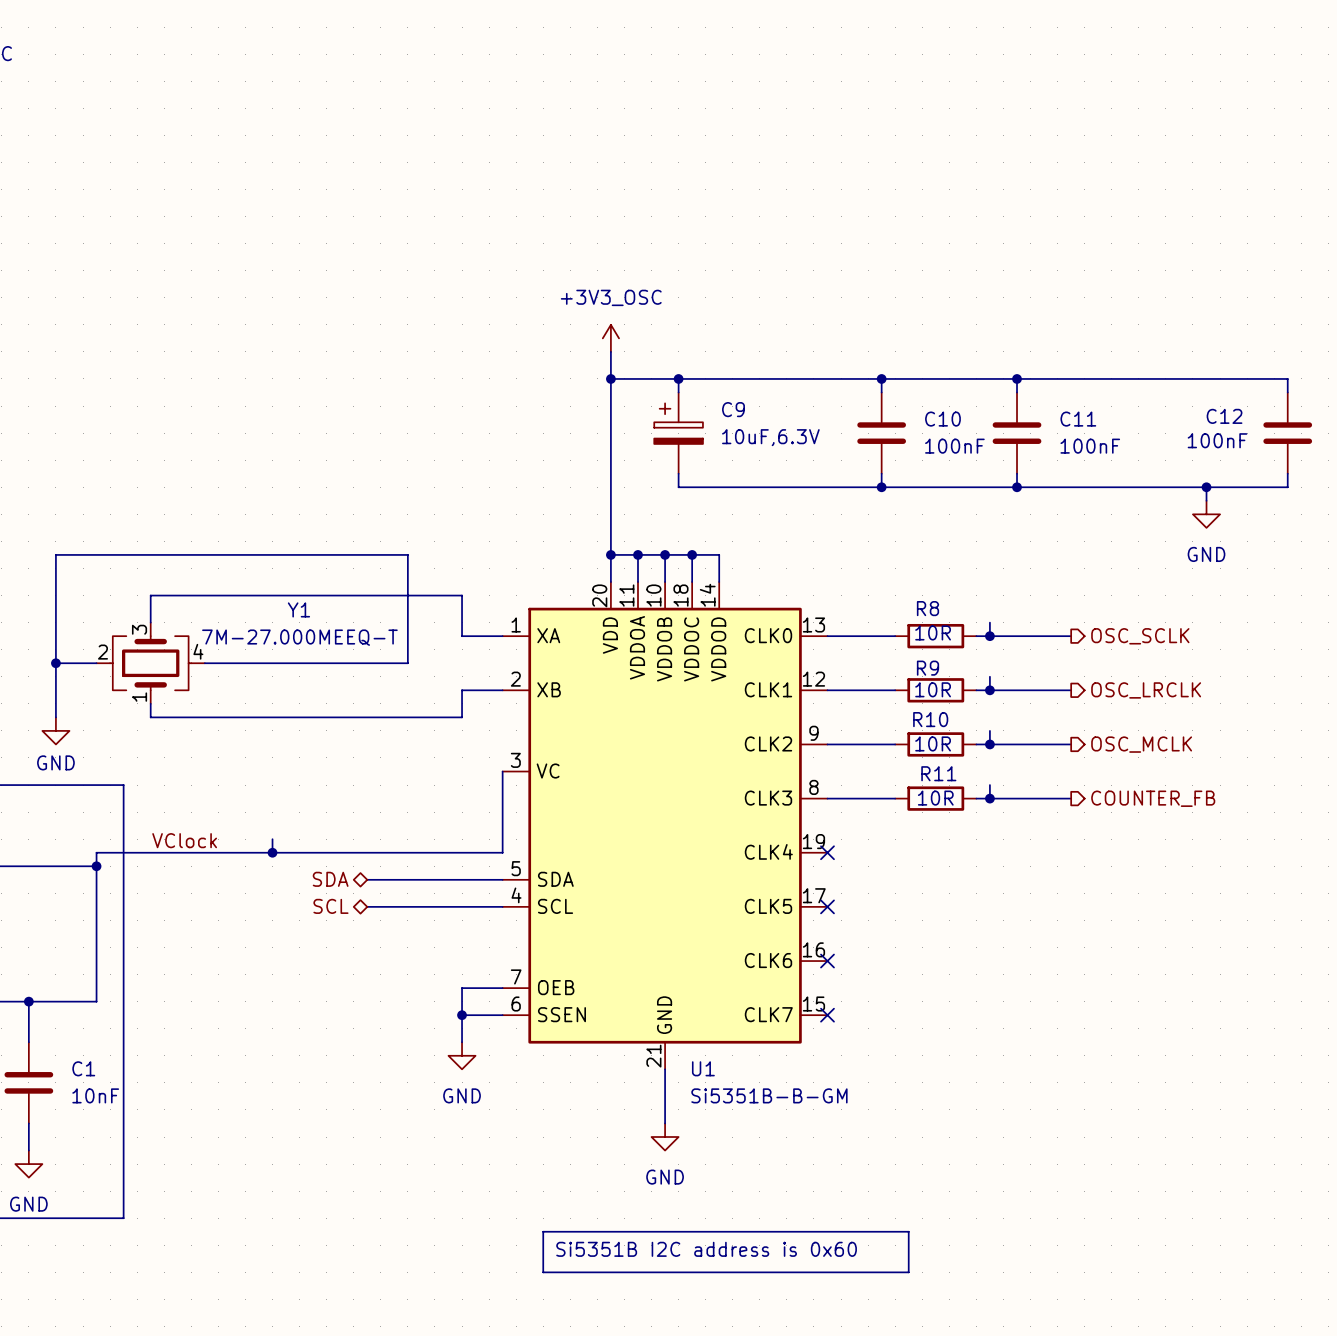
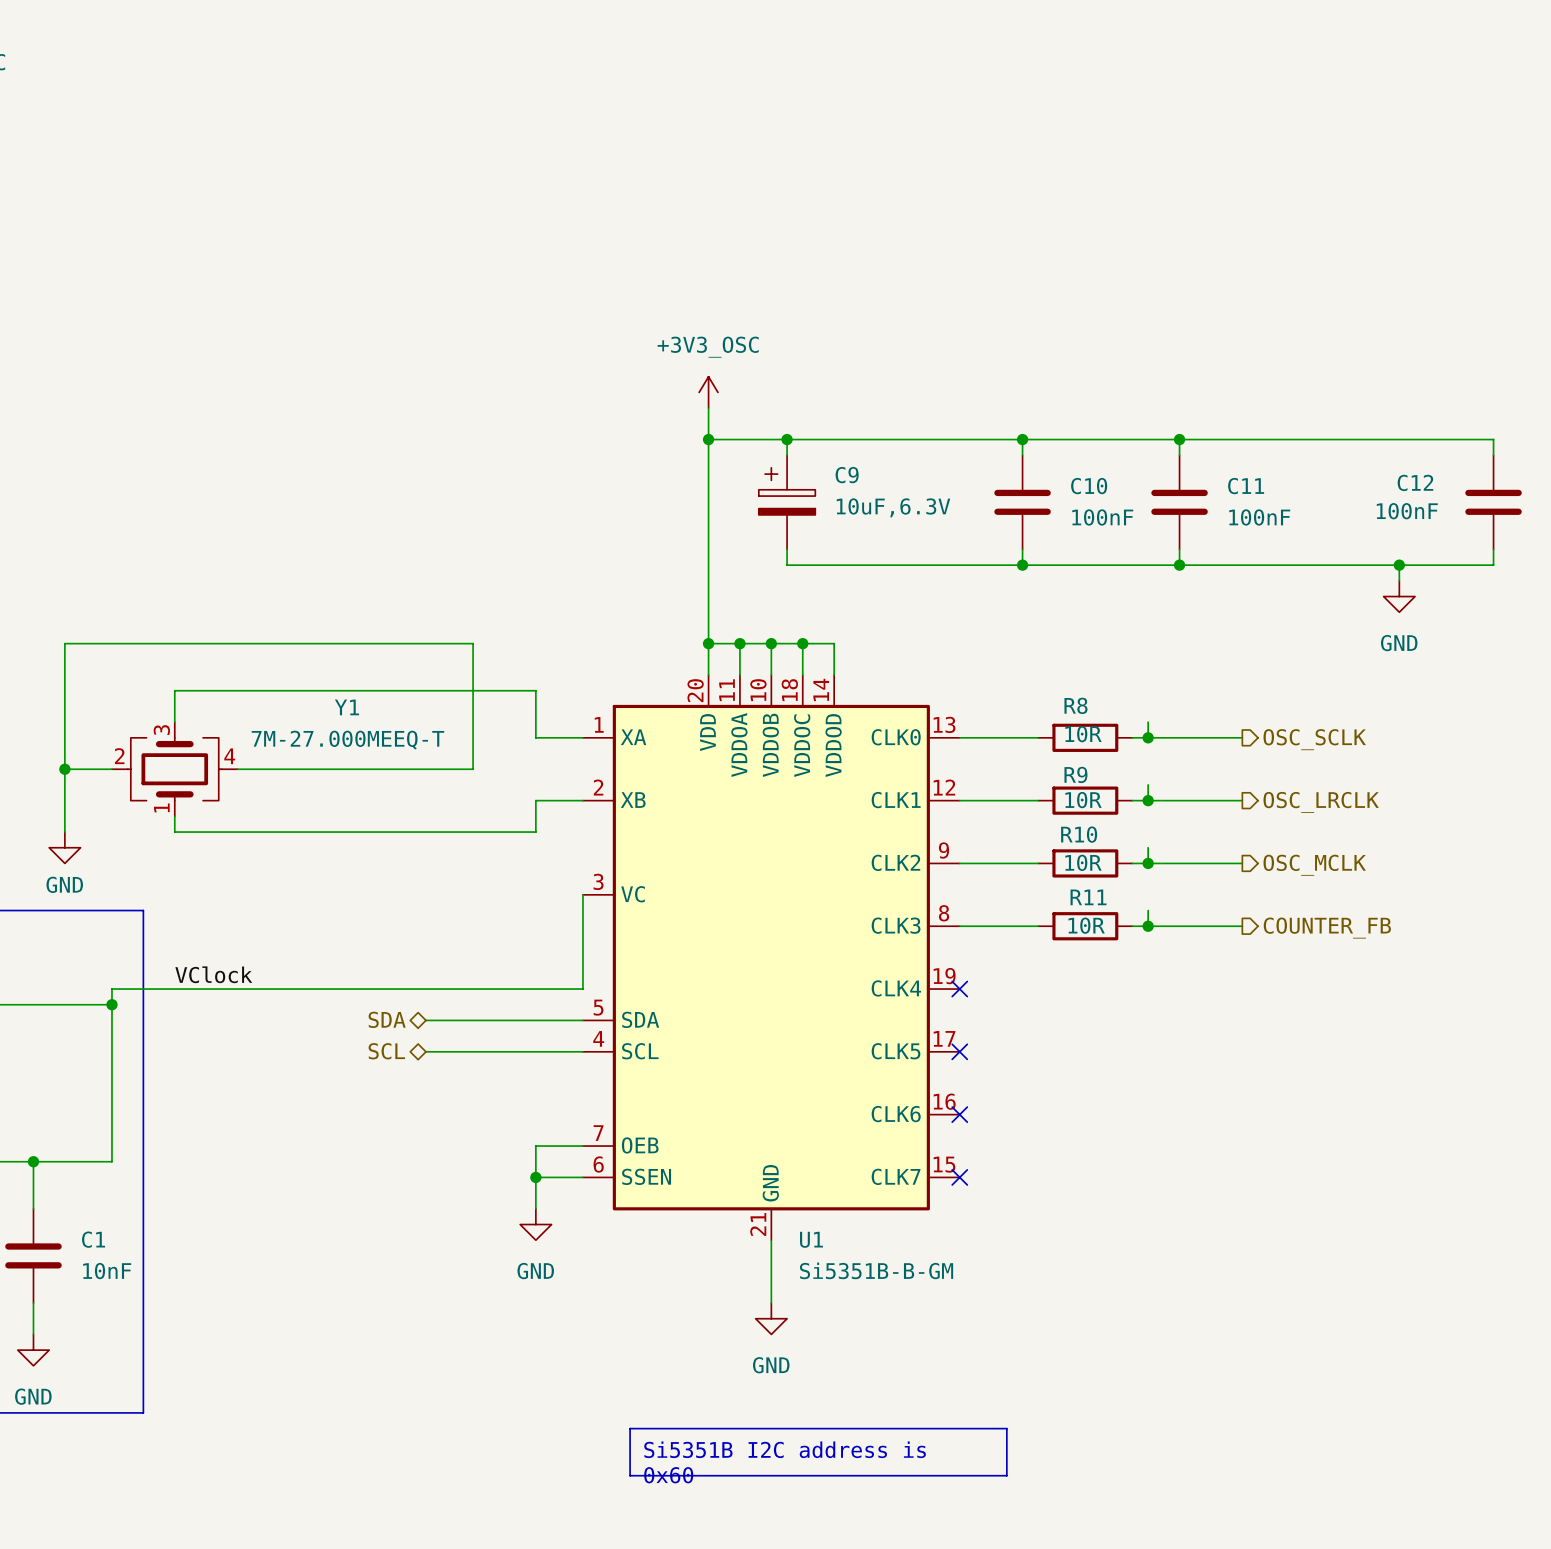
wire: (272, 839) (272, 852) -> none
junction: (272, 852) -> none
line: (868, 1231) (908, 1231) (908, 1272) (868, 1272) -> (1006, 1428) (1006, 1475)
text: Si5351B I2C address is 0x60 (706, 1249) -> Si5351B I2C address is (785, 1449)
text: none -> 0x60 (668, 1475)

